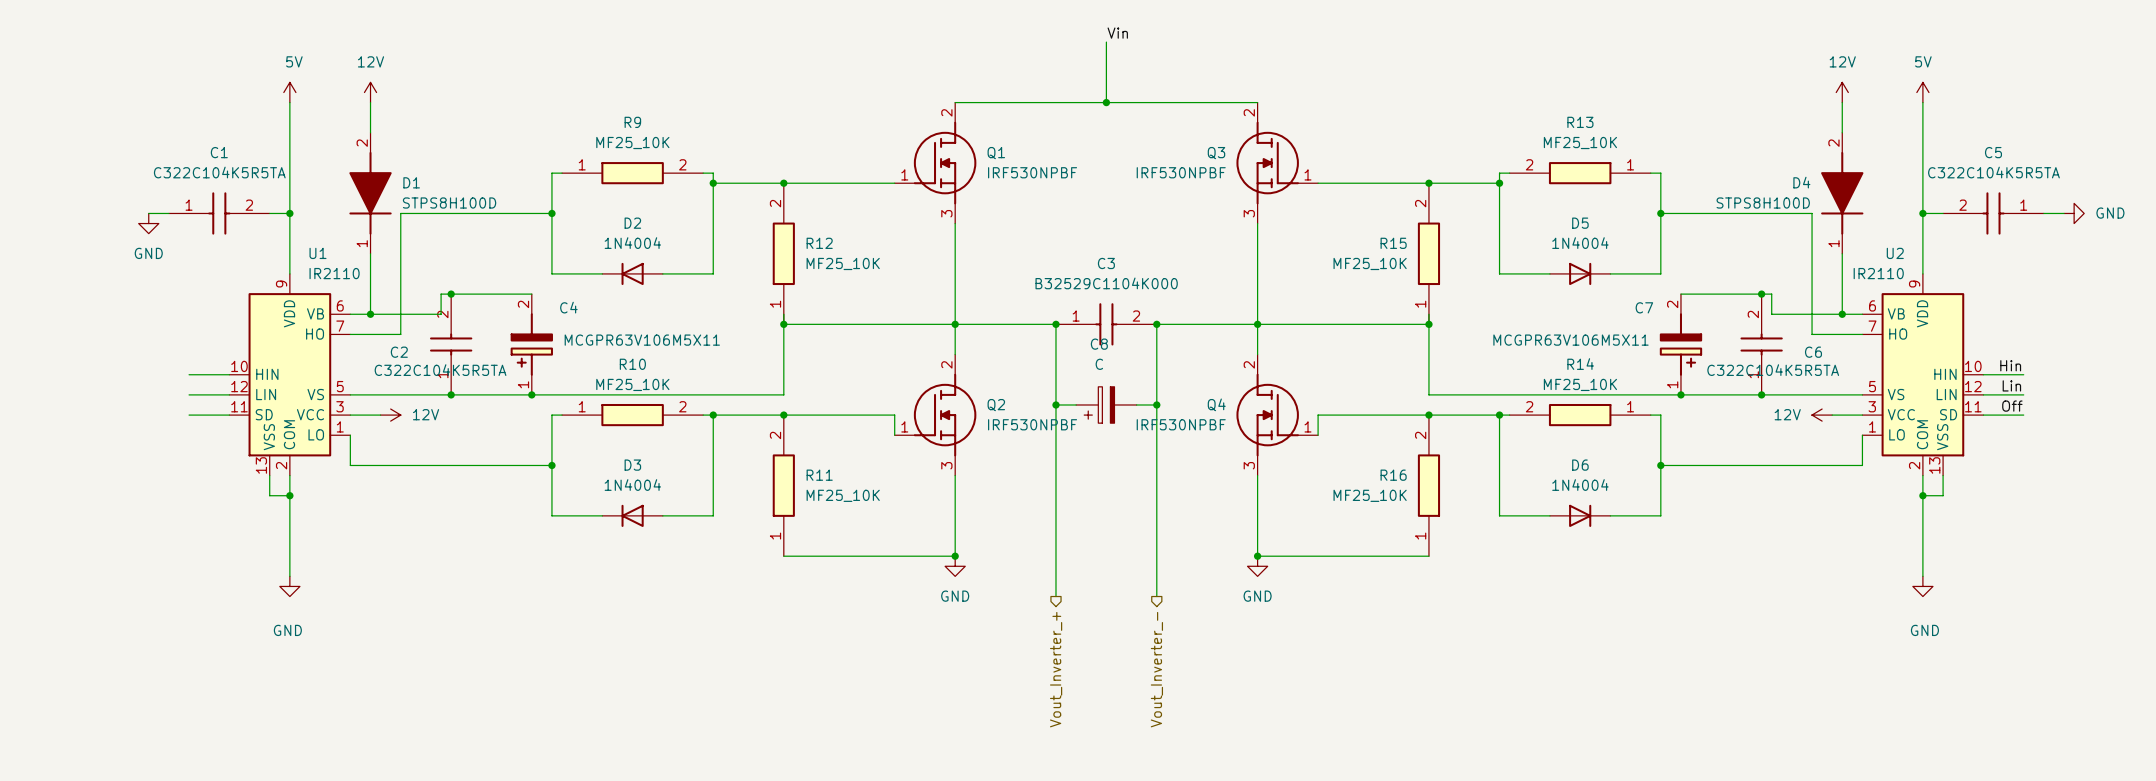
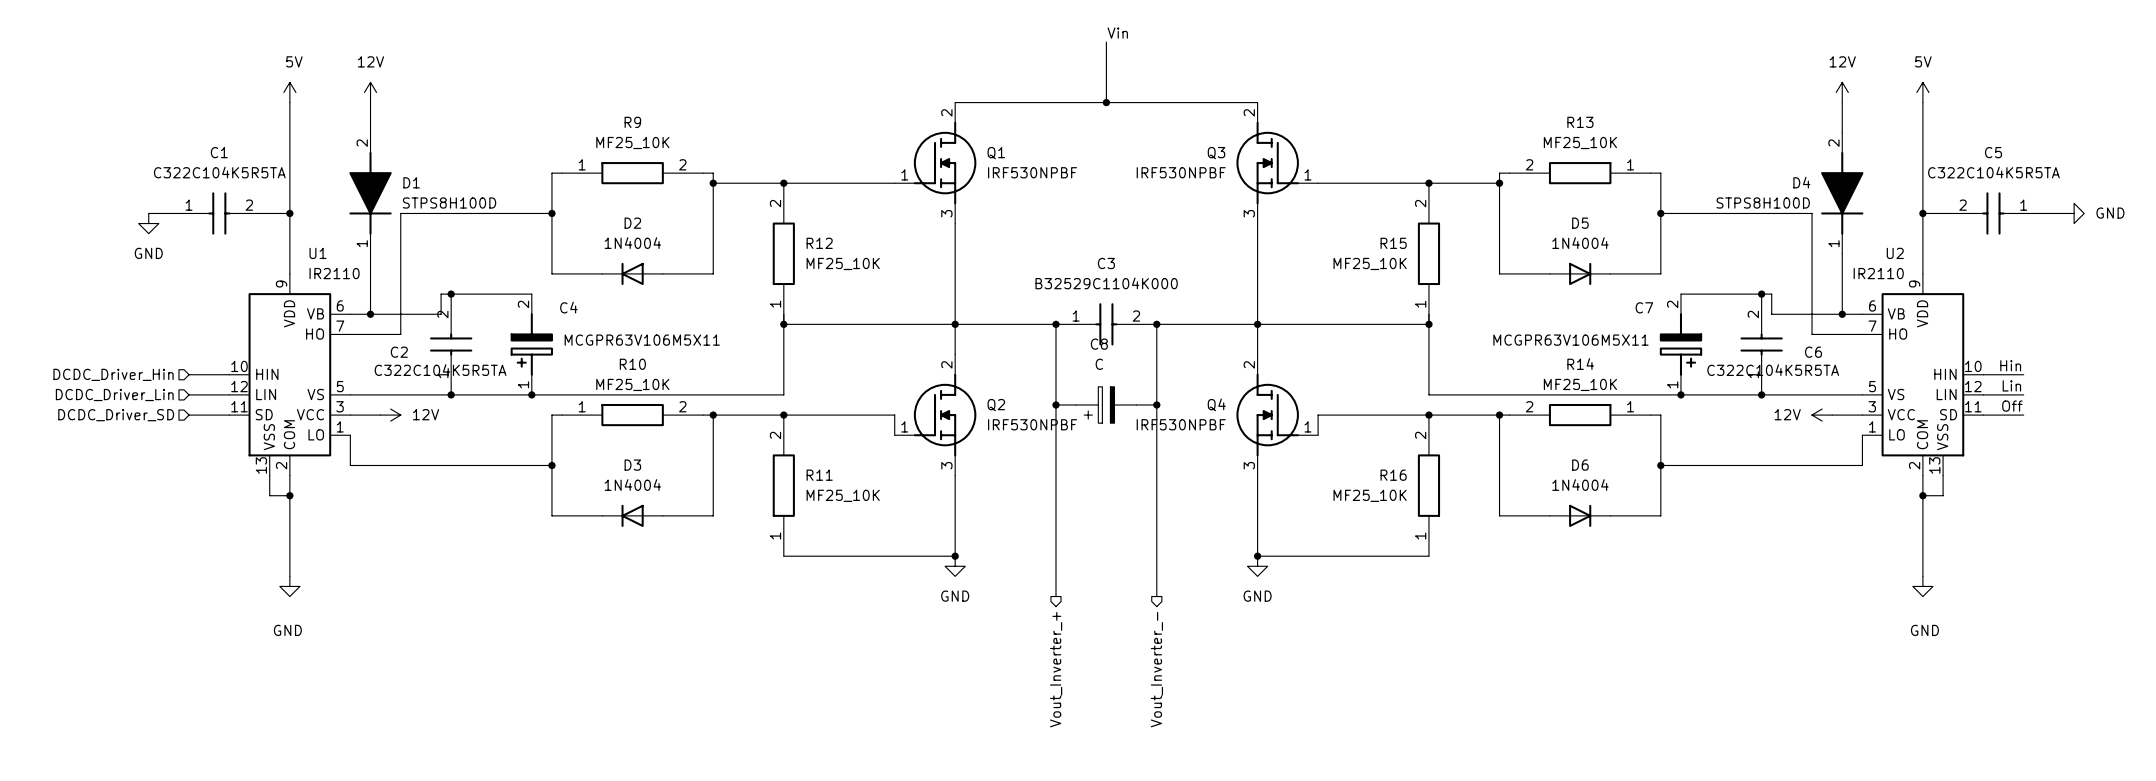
hierarchical label: none -> DCDC_Driver_Hin (113, 374)
hierarchical label: none -> DCDC_Driver_Lin (114, 395)
hierarchical label: none -> DCDC_Driver_SD (116, 415)

